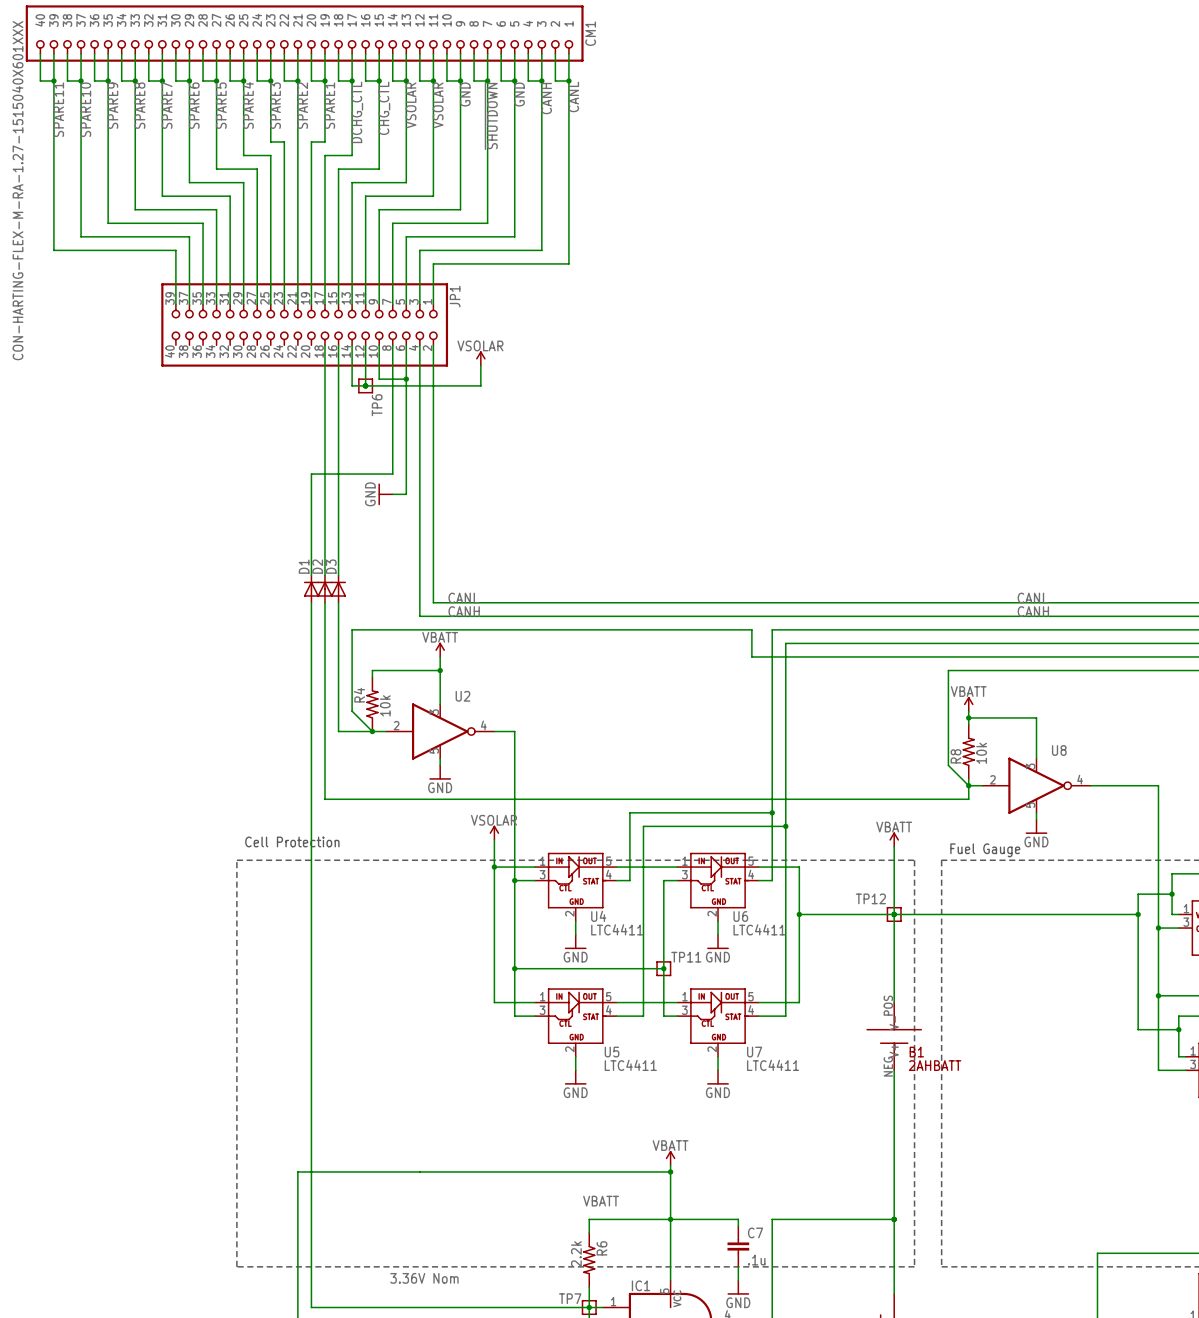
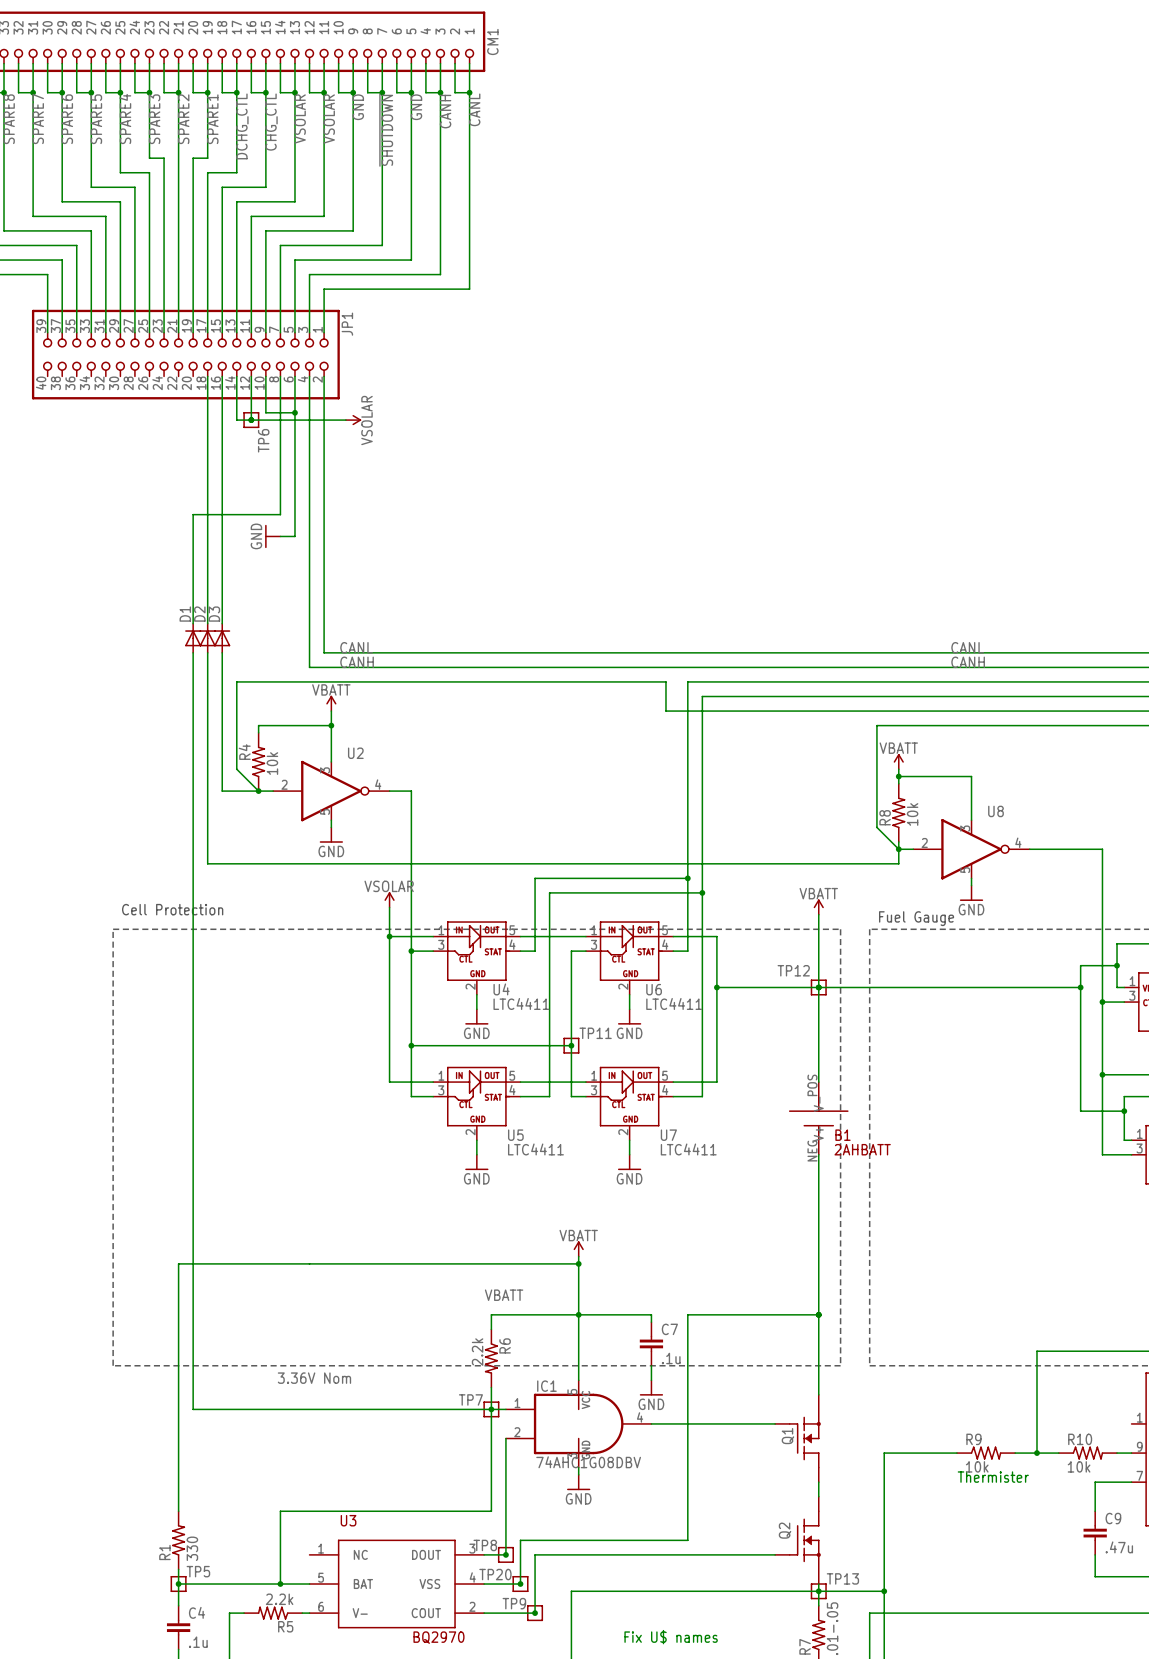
power symbol rotation: 0° (480, 355) -> 90° clockwise (356, 420)
power symbol position: VSOLAR (480, 358) -> VSOLAR (353, 420)
wire: (480, 365) (480, 385) (453, 385) -> none

